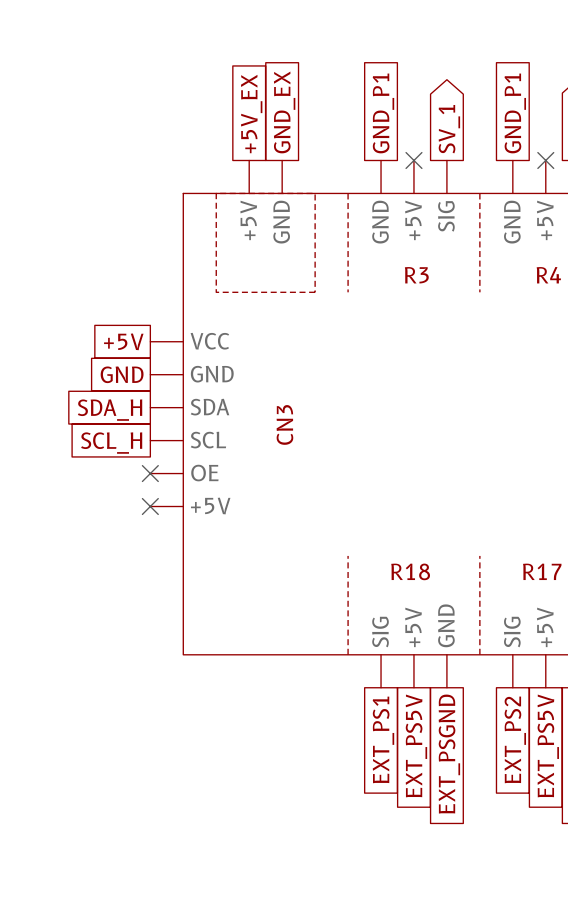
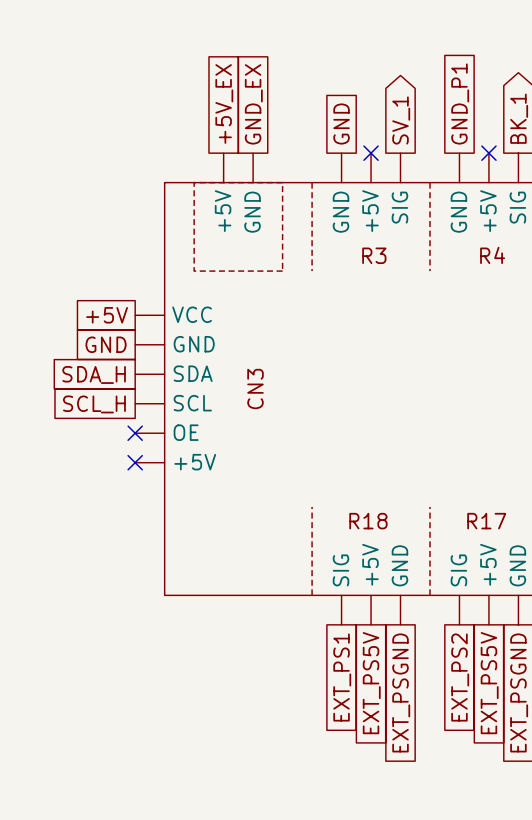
global label: GND_P1 (383, 113) -> GND (341, 124)

